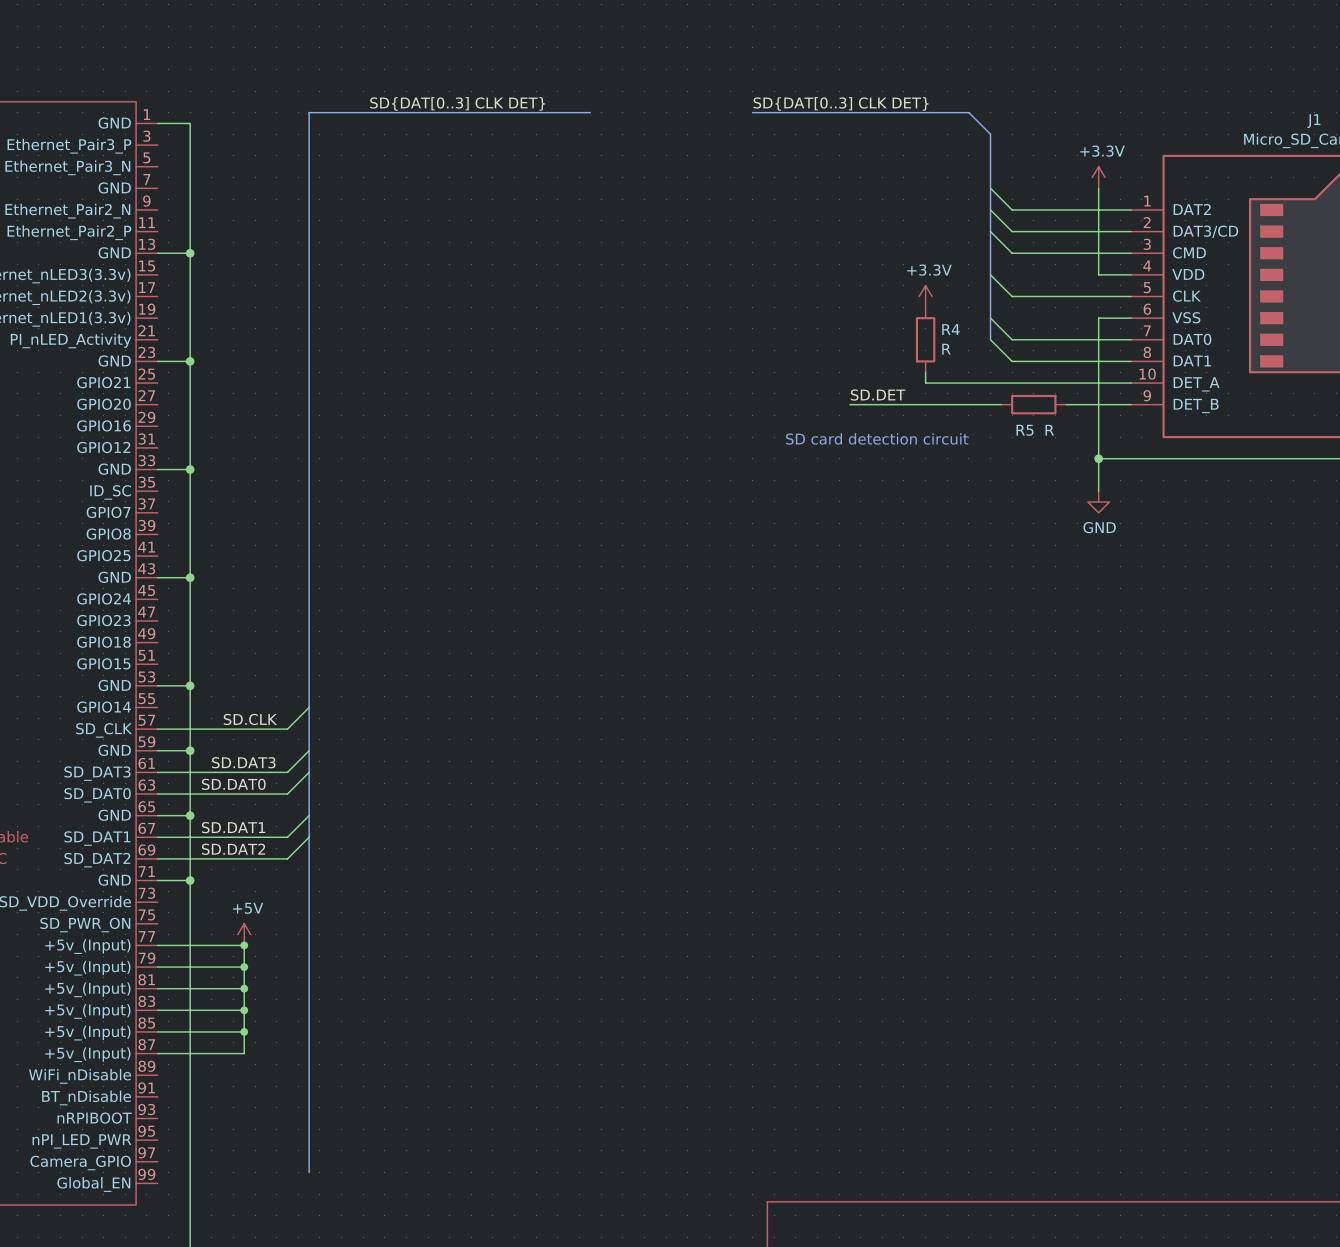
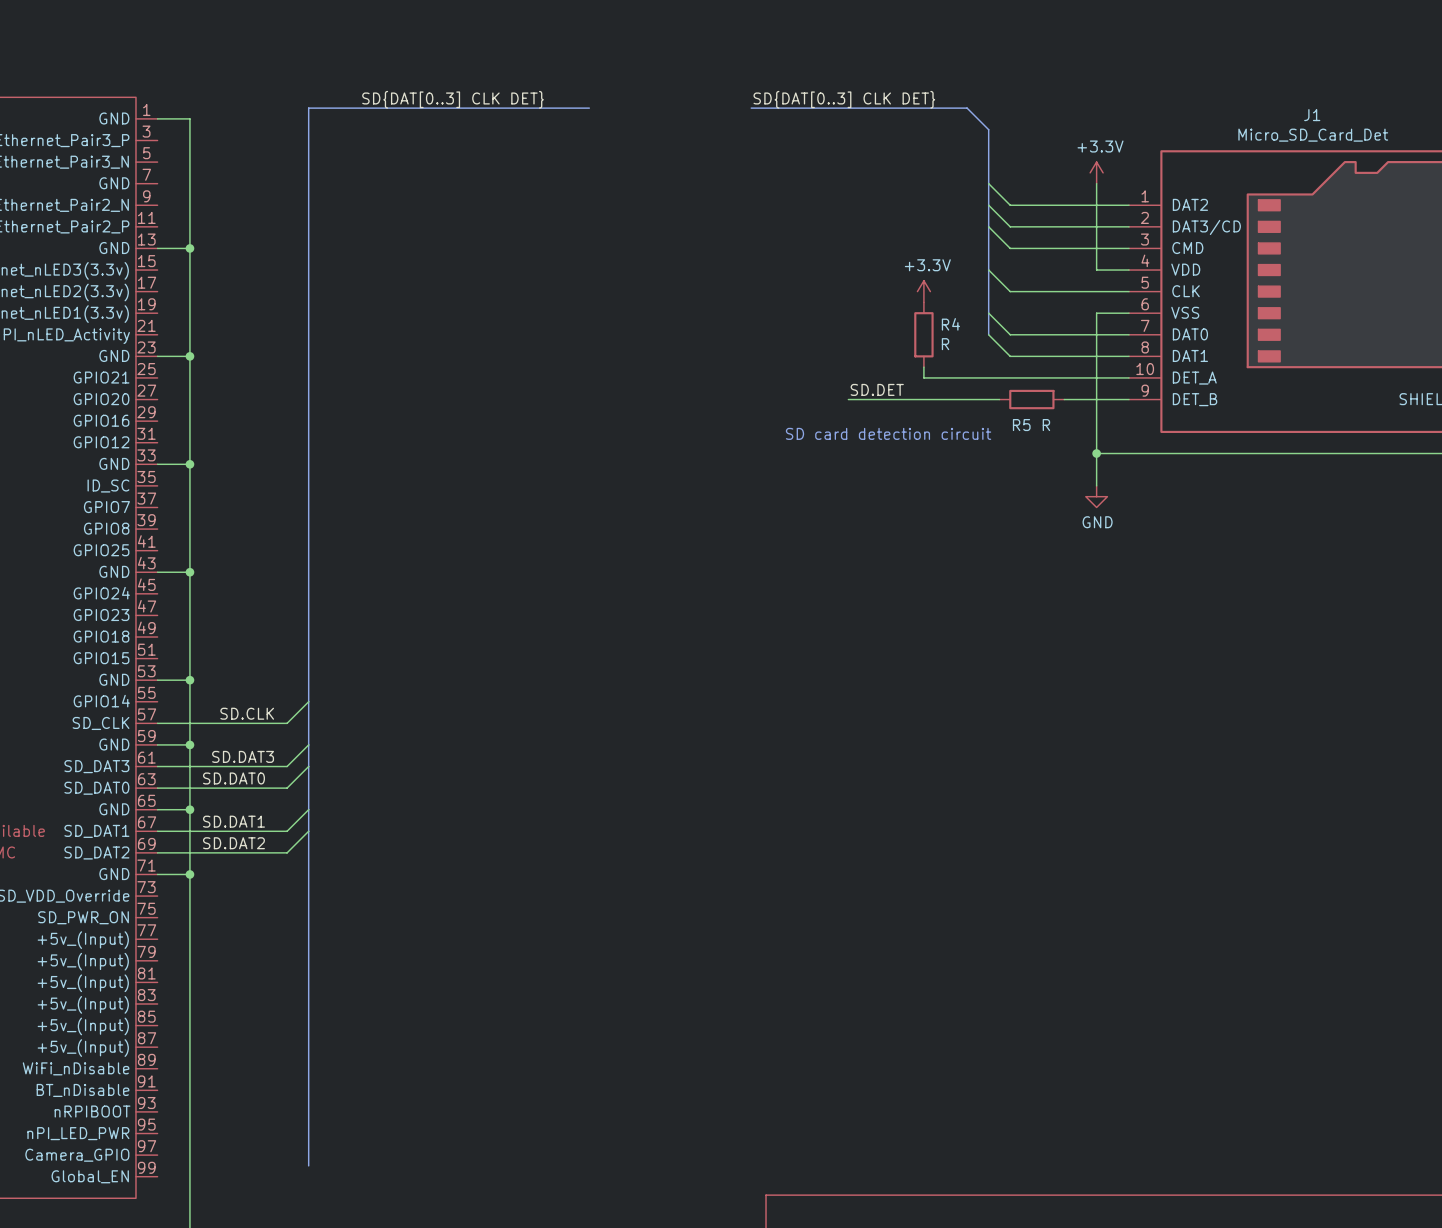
power symbol: +5V (244, 934) -> none
wire: (157, 945) (244, 945) (244, 1053) (157, 1053) -> none
junction: (244, 945) -> none
wire: (157, 967) (244, 967) -> none
junction: (244, 967) -> none
wire: (157, 988) (244, 988) -> none
junction: (244, 988) -> none
wire: (157, 1010) (244, 1010) -> none
junction: (244, 1010) -> none
wire: (157, 1031) (244, 1031) -> none
junction: (244, 1031) -> none

